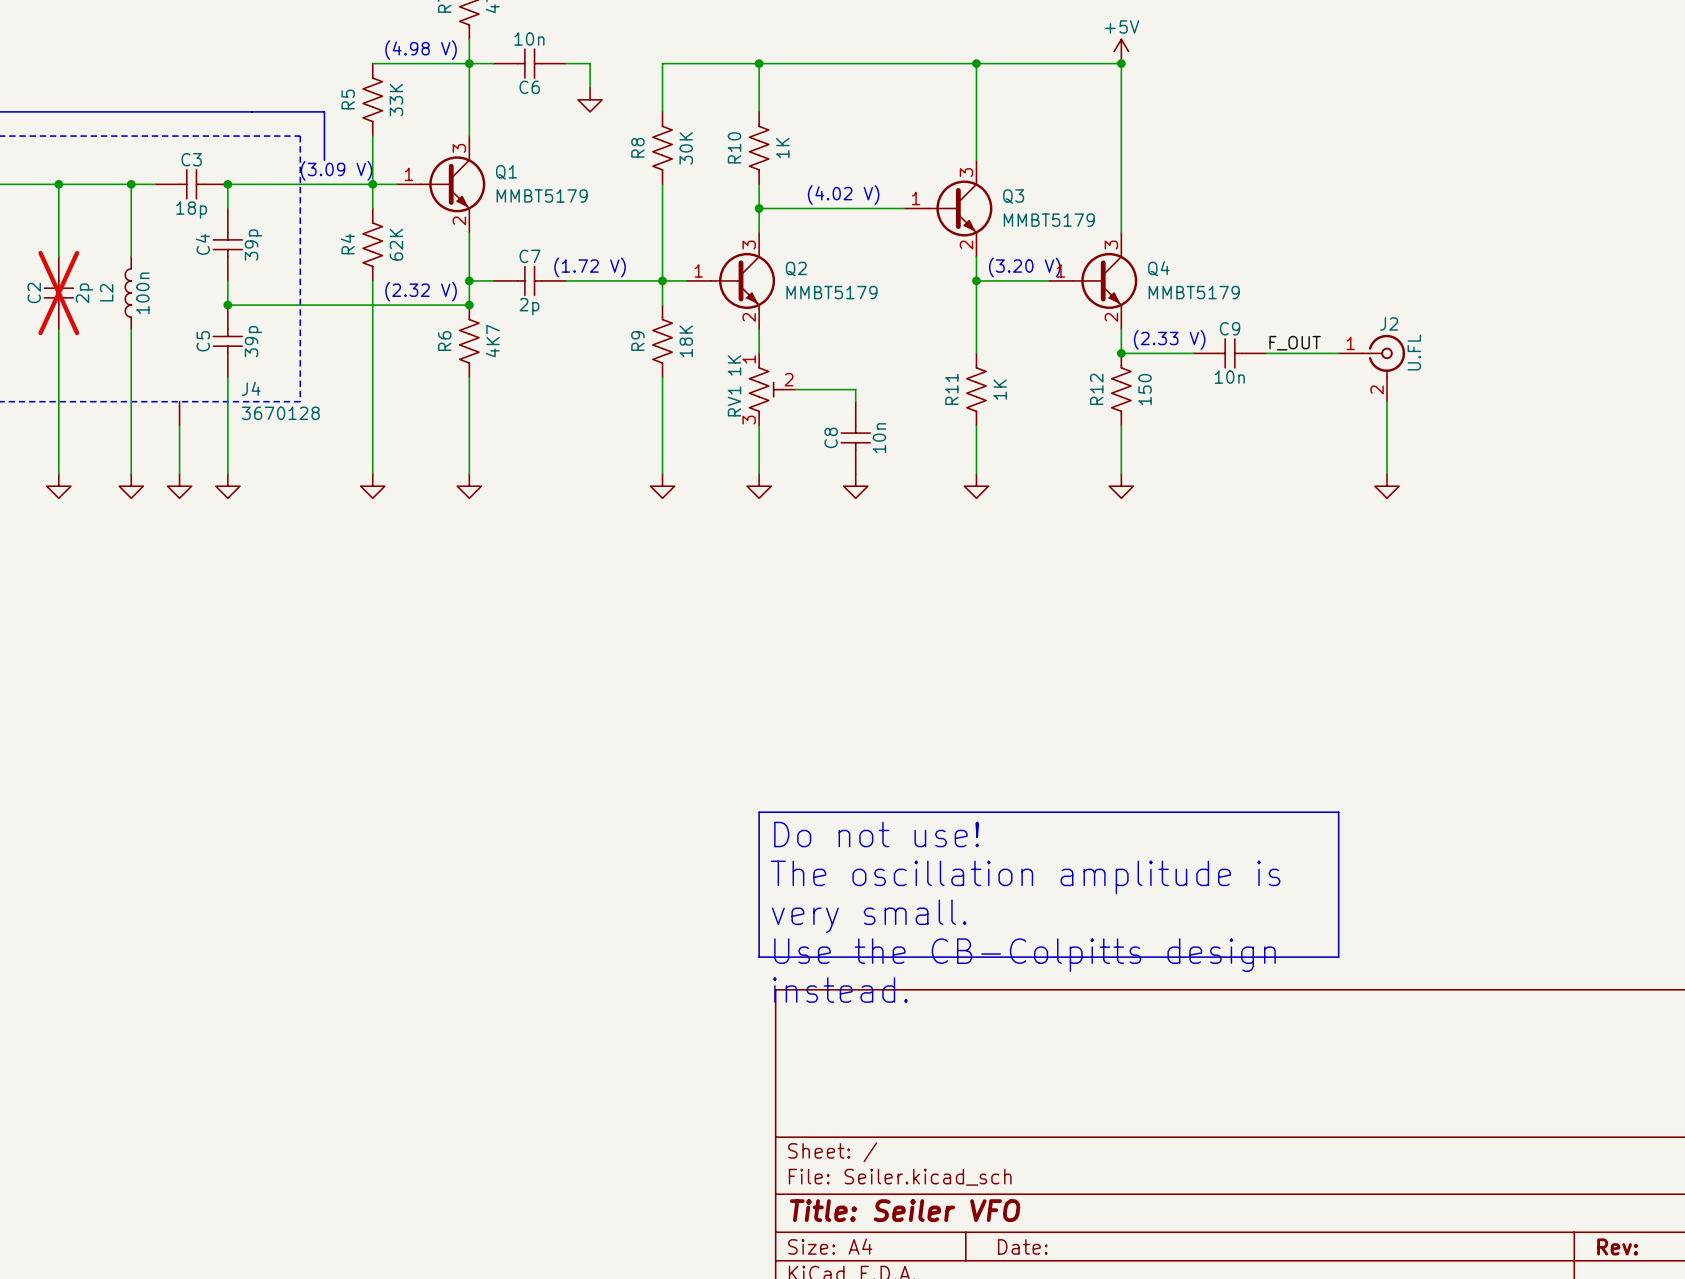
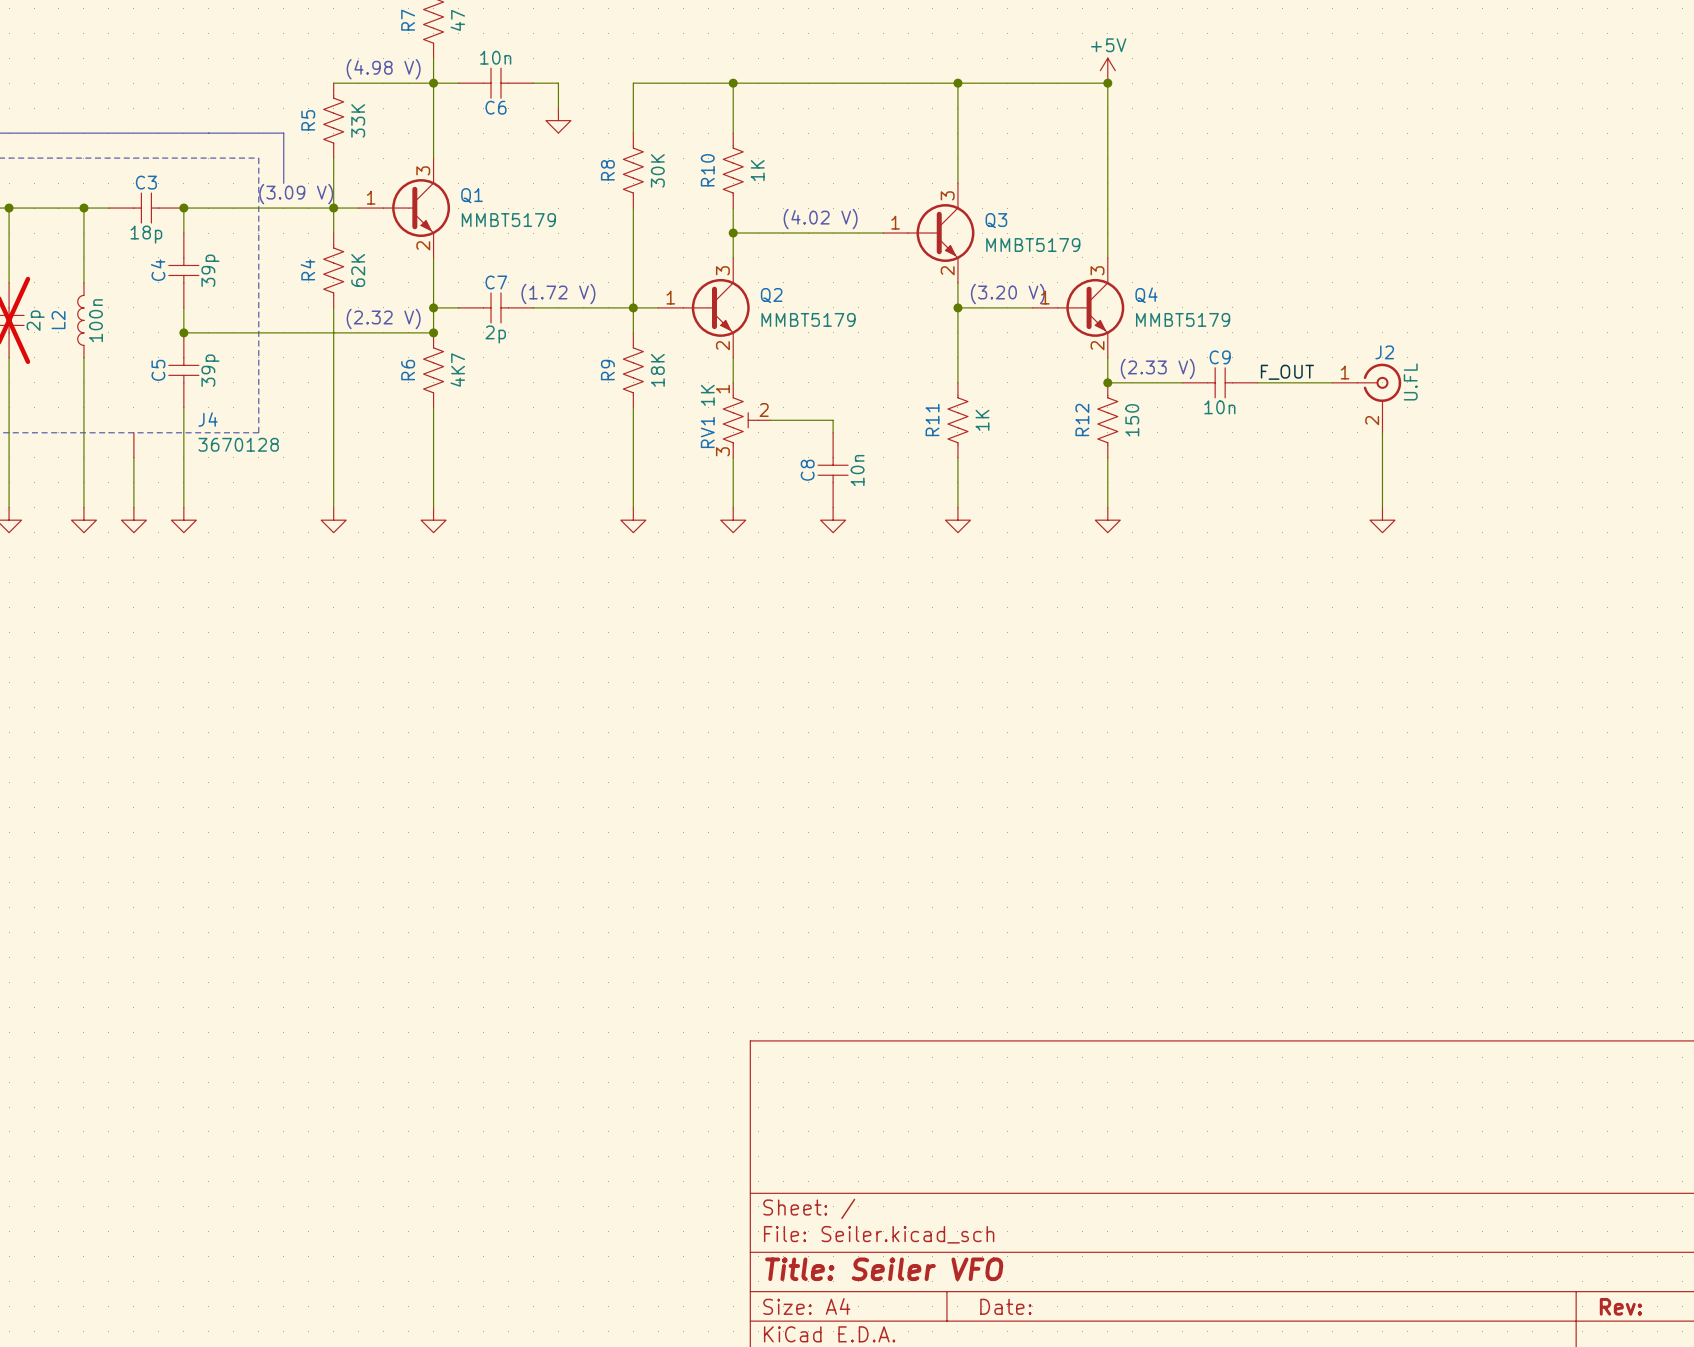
line: (759, 812) (1338, 812) (1338, 957) (759, 957) (759, 812) -> none
text: Do not use! (876, 834) -> none
text: The oscillation amplitude is (1025, 877) -> none
text: very small. (869, 916) -> none
text: Use the CB-Colpitts design (1024, 955) -> none
text: instead. (840, 990) -> none

